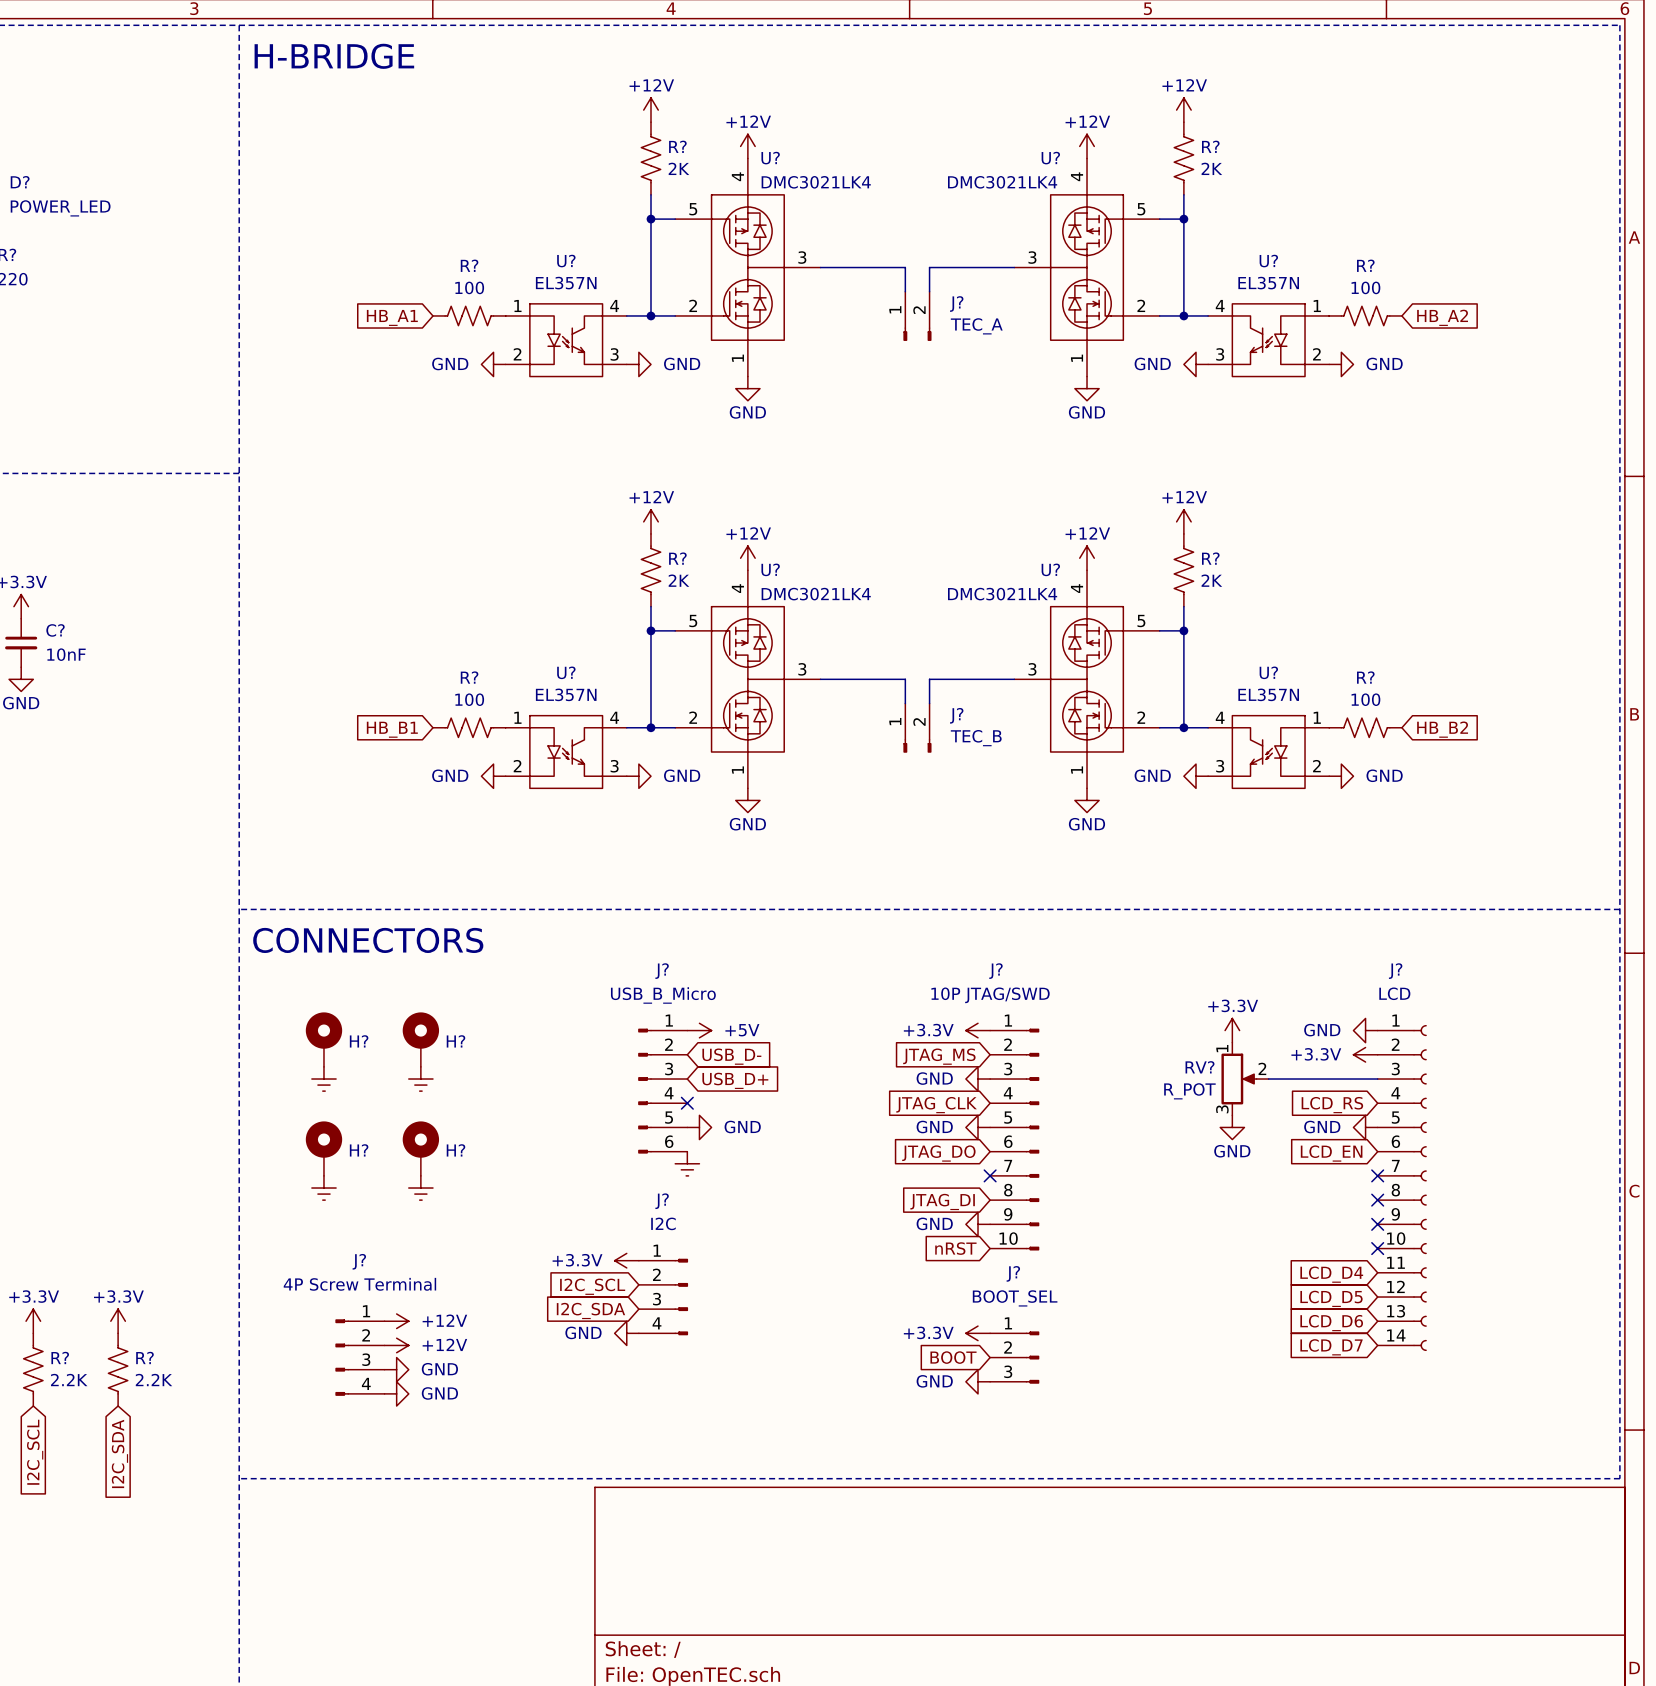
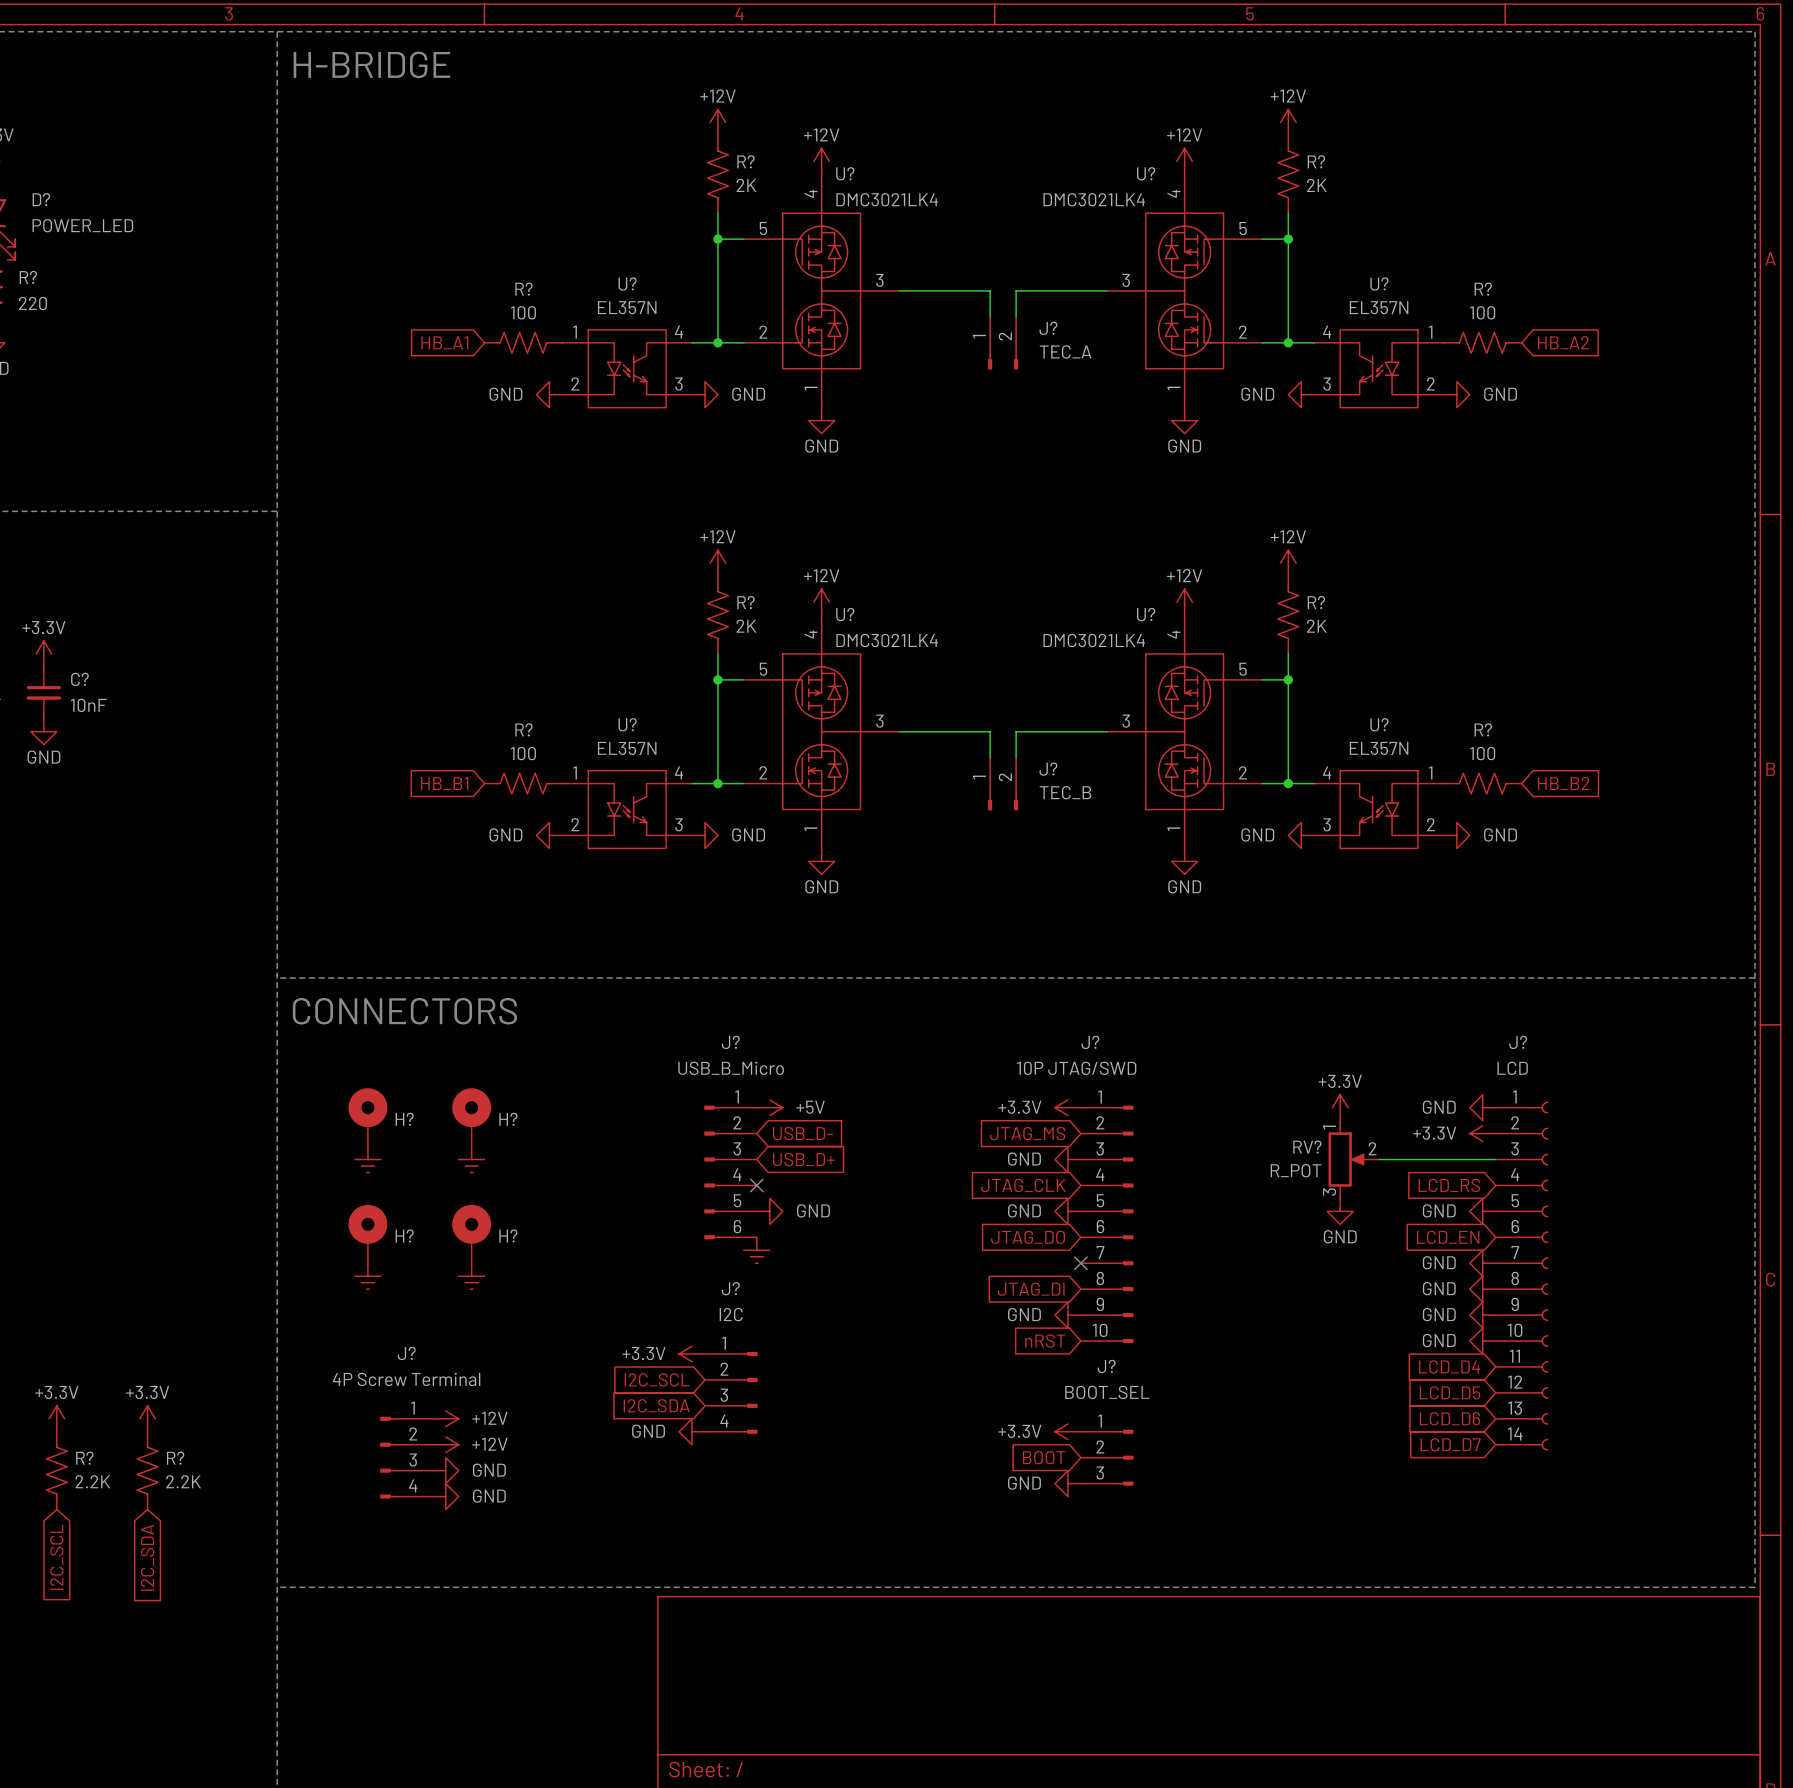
power symbol: none -> GND (1482, 1263)
no-connect mark: (1377, 1175) -> none
power symbol: none -> GND (1482, 1289)
no-connect mark: (1377, 1200) -> none
power symbol: none -> GND (1482, 1315)
no-connect mark: (1377, 1224) -> none
power symbol: none -> GND (1482, 1341)
no-connect mark: (1377, 1248) -> none

